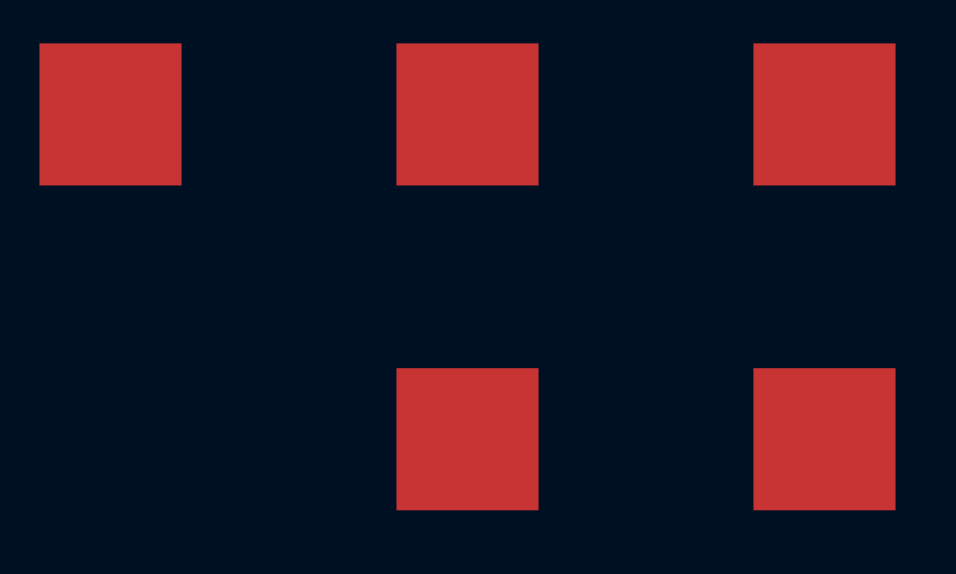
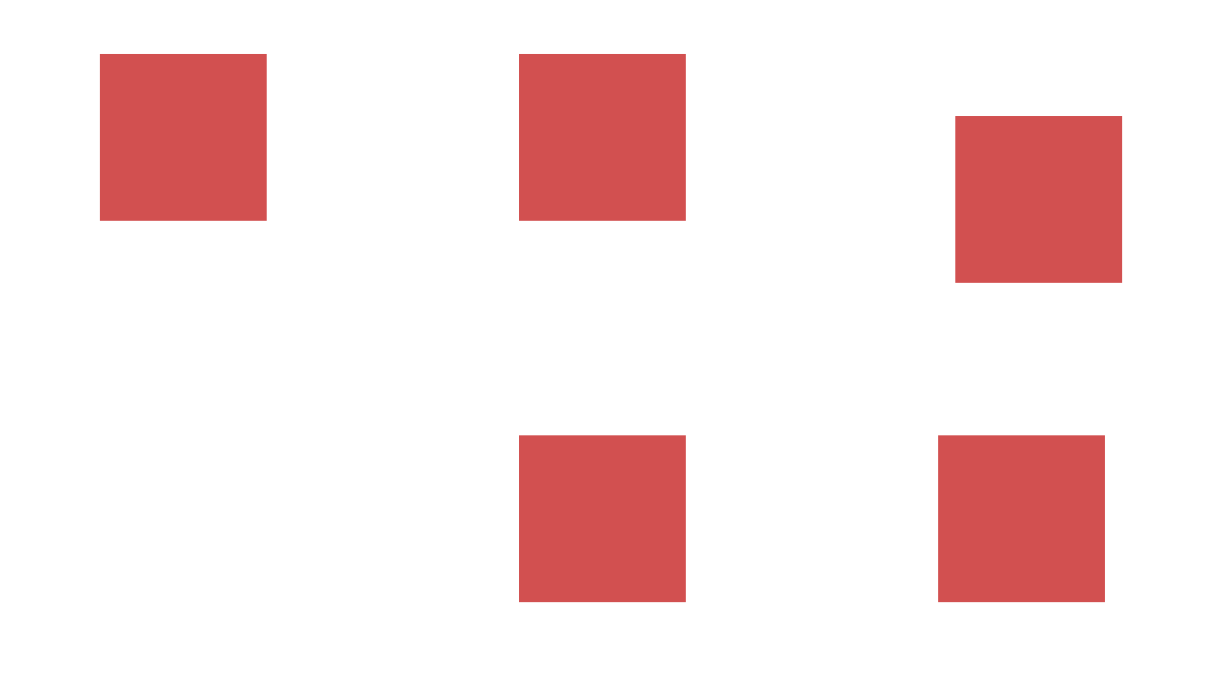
part position: (824, 114) -> (1038, 199)

